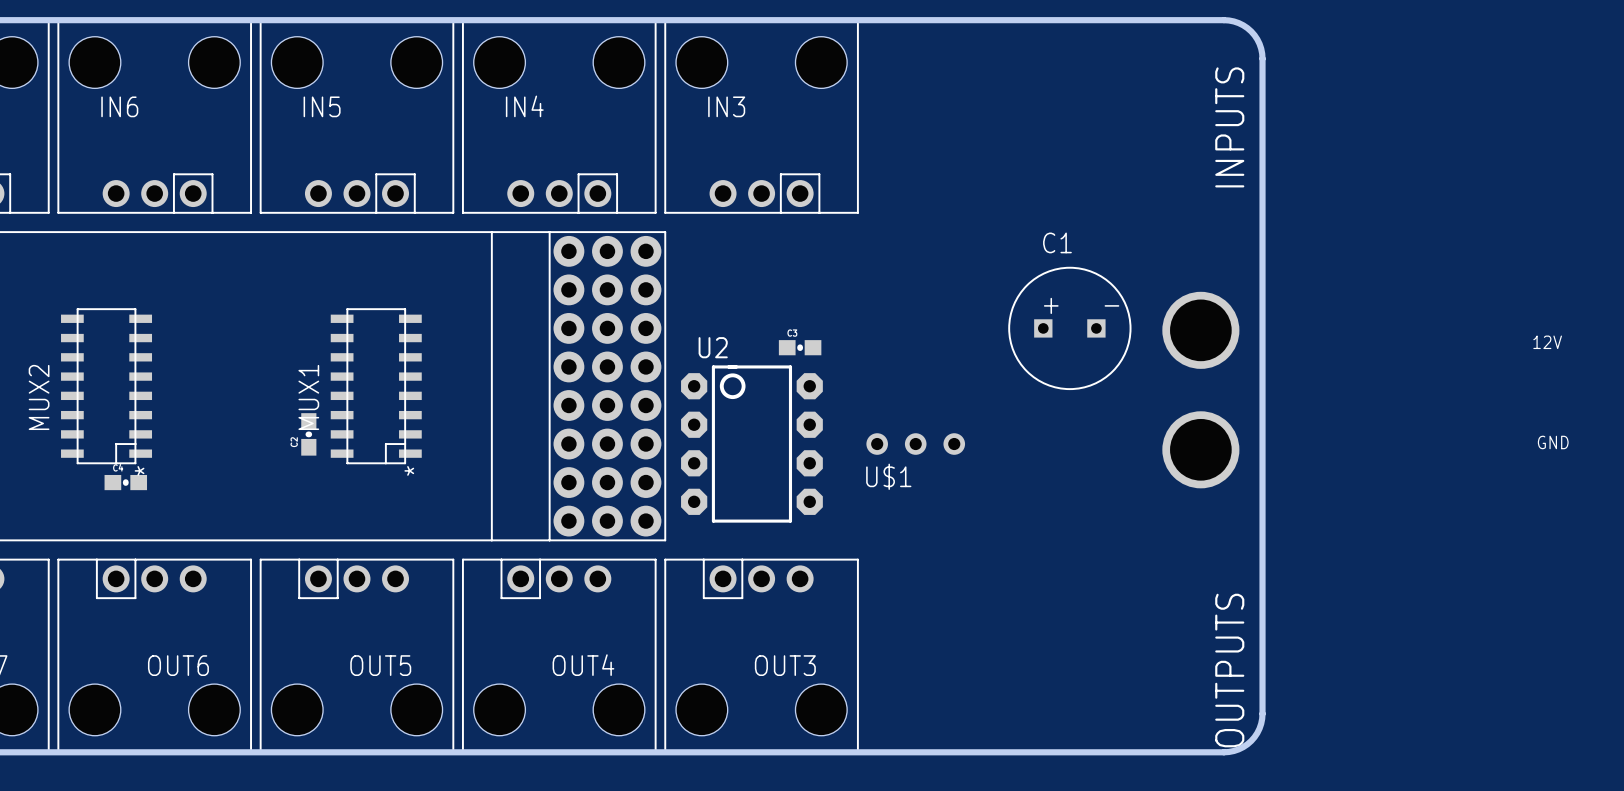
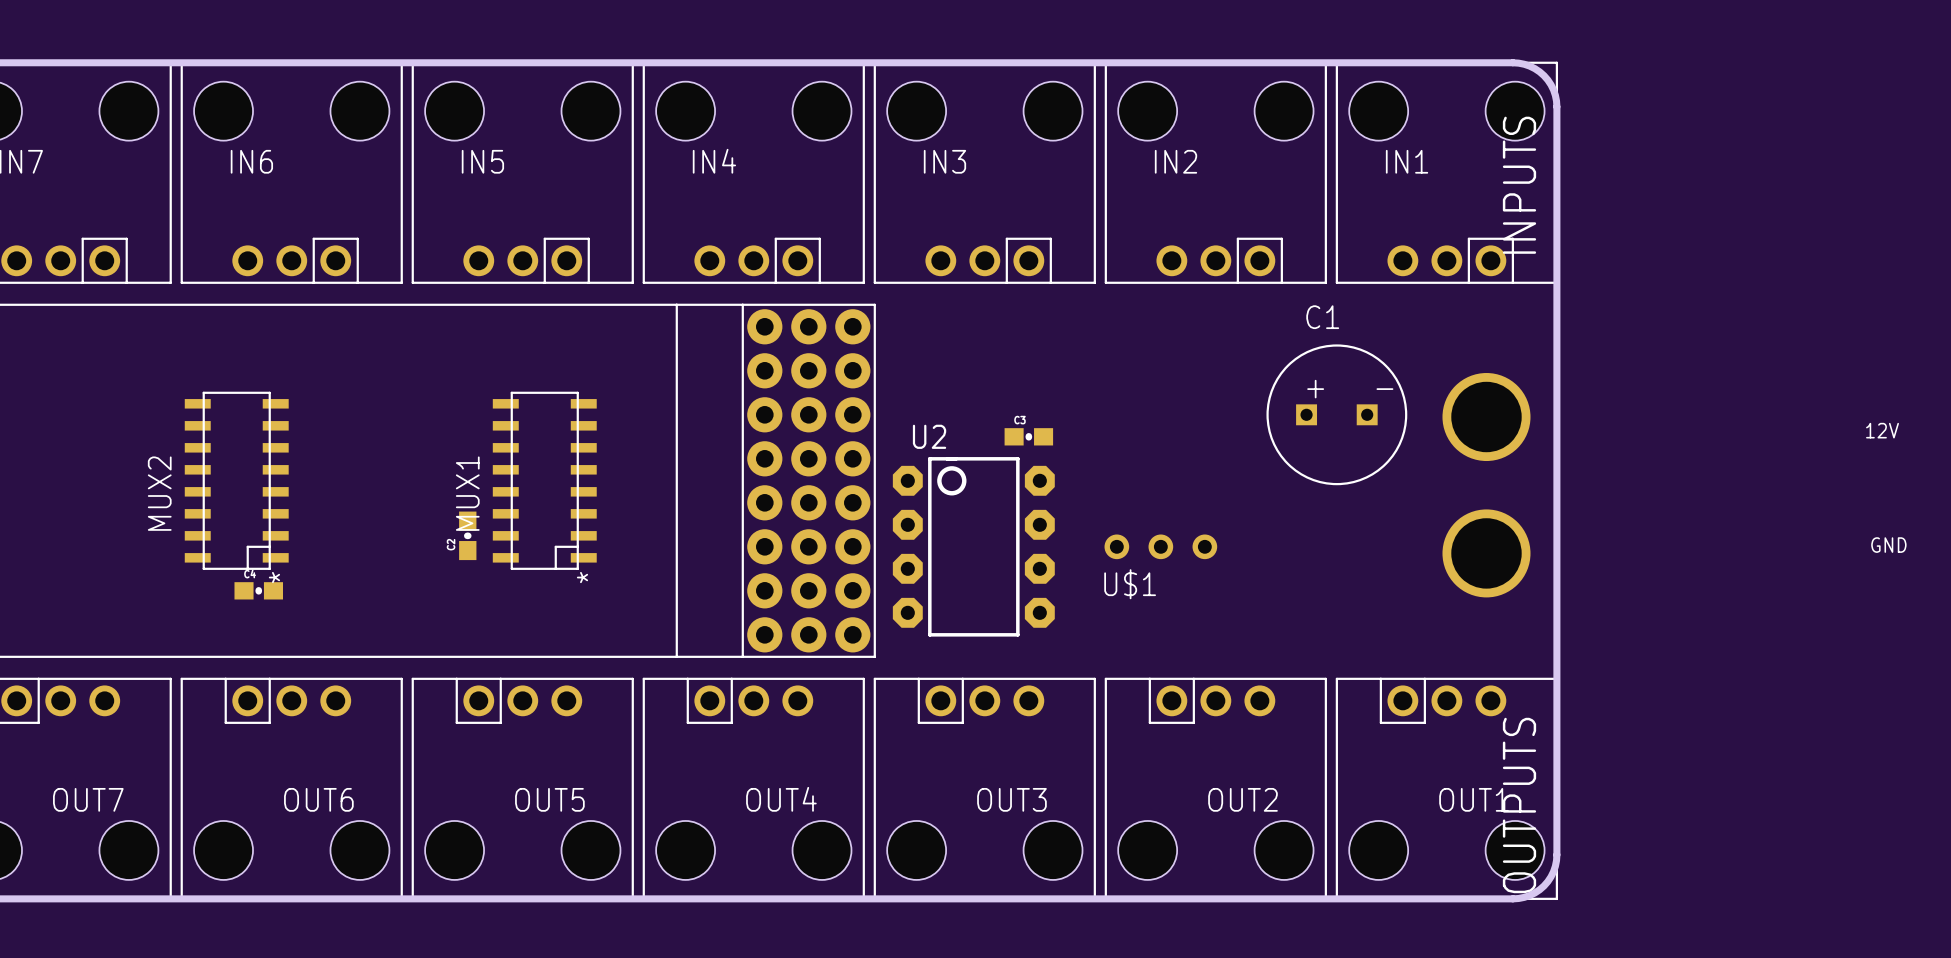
IN2: none -> (1215, 172)
IN1: none -> (1446, 172)
OUT2: none -> (1215, 788)
OUT1: none -> (1446, 788)

